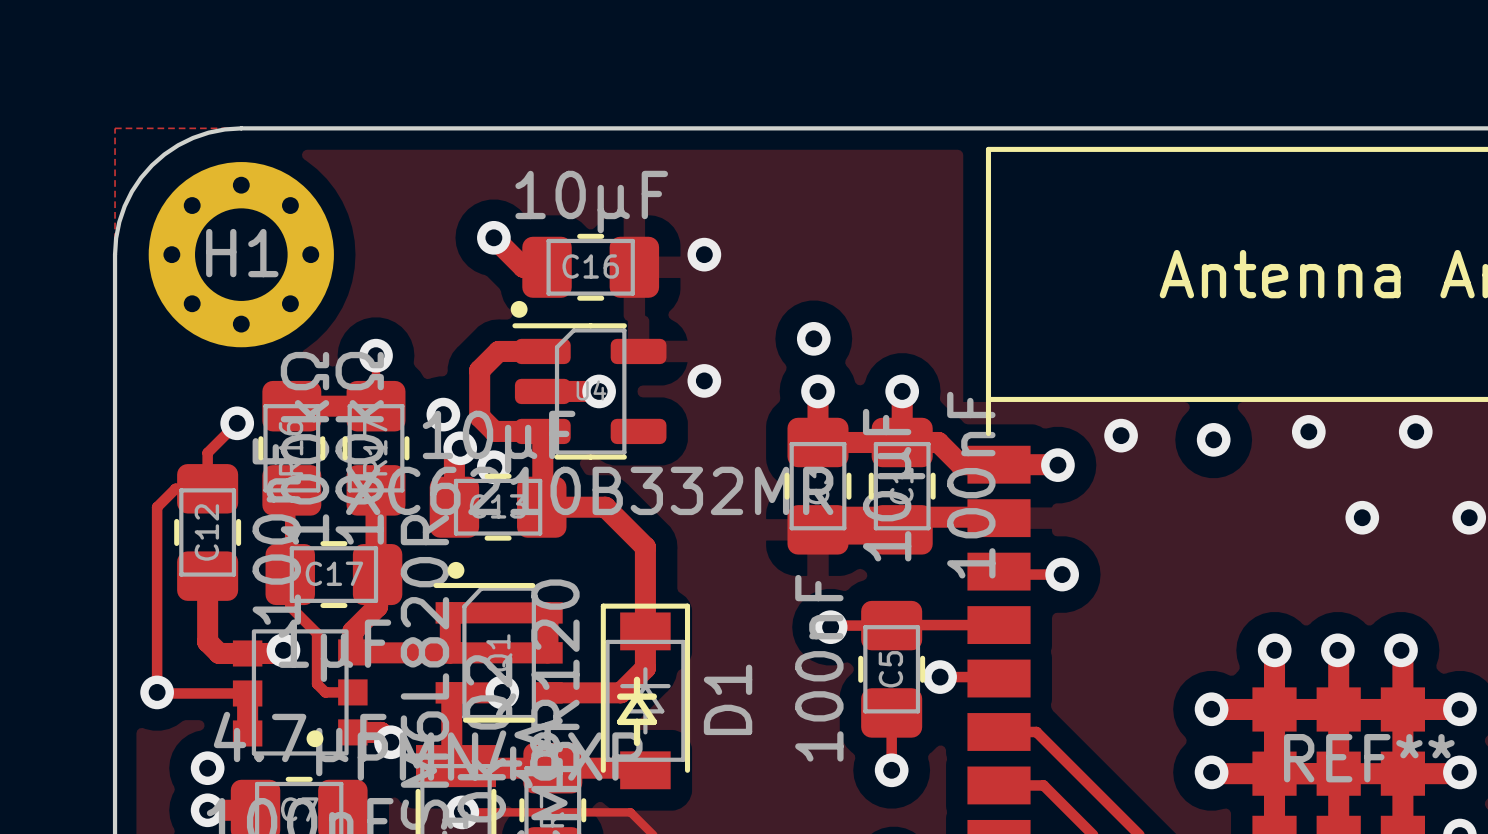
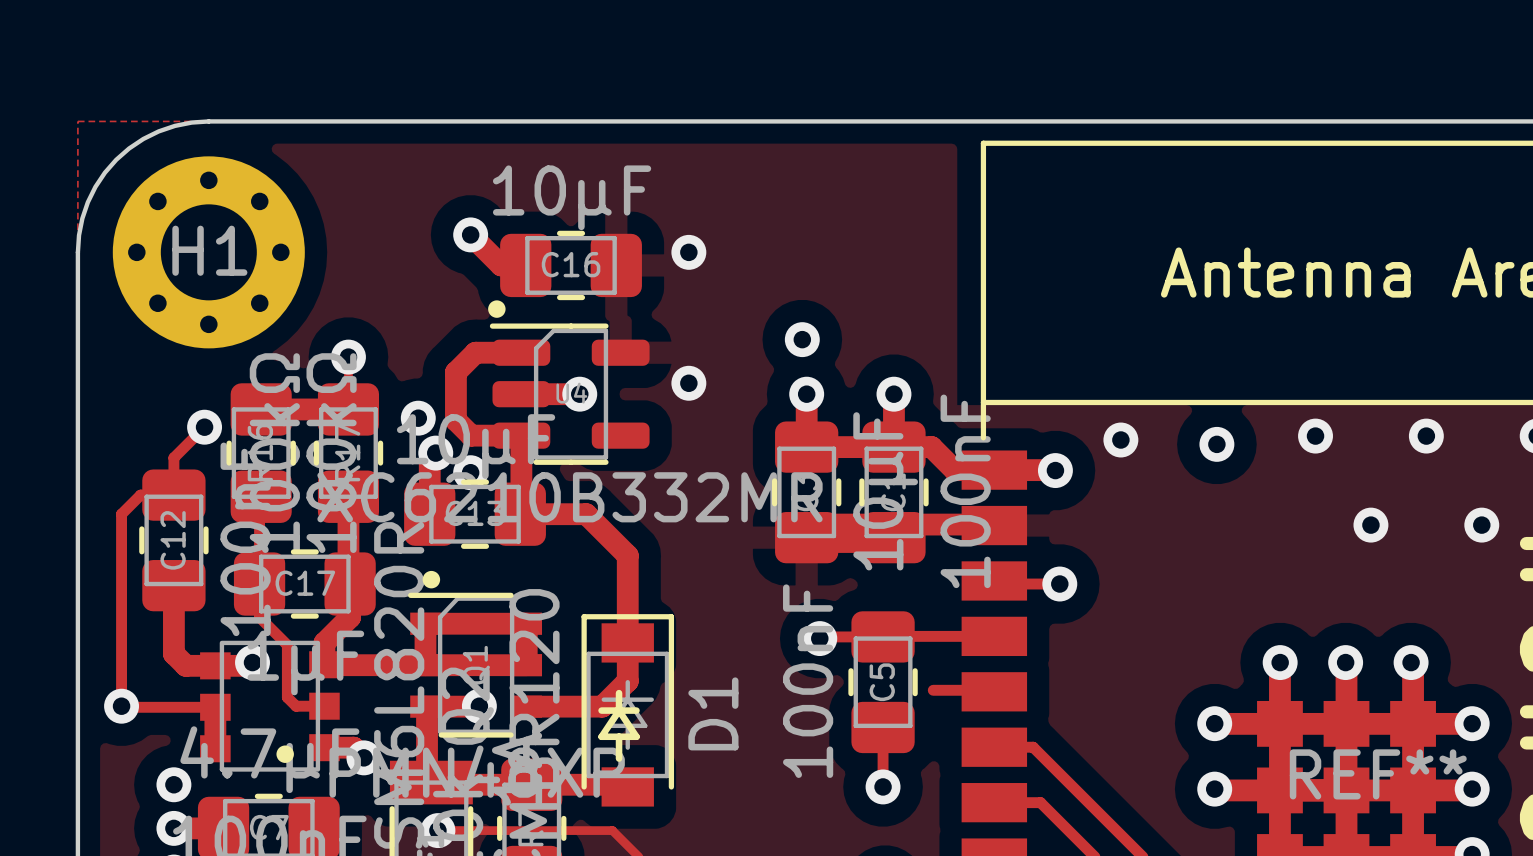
via: (940, 677) -> none

